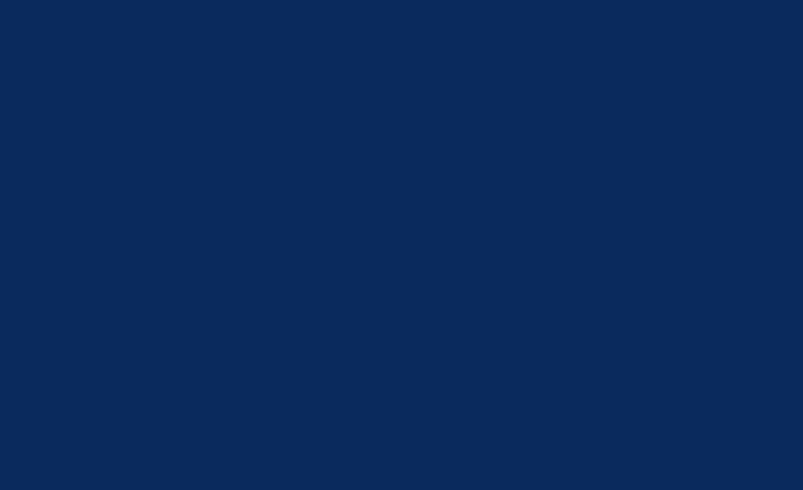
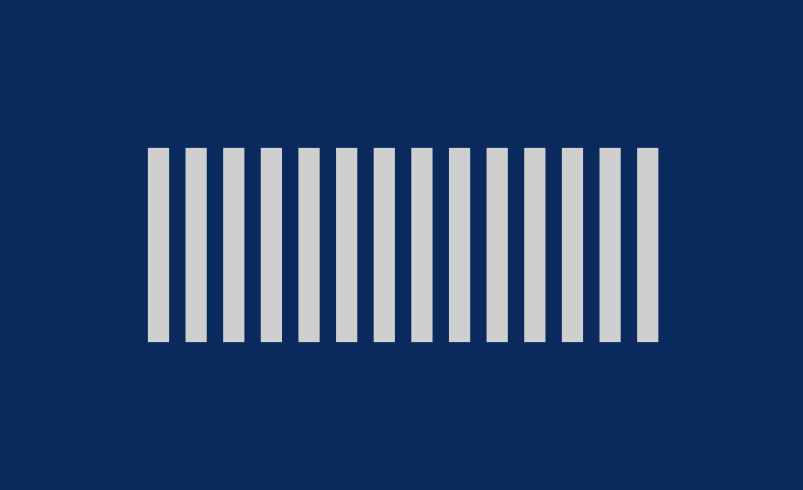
part: none -> (403, 244)

